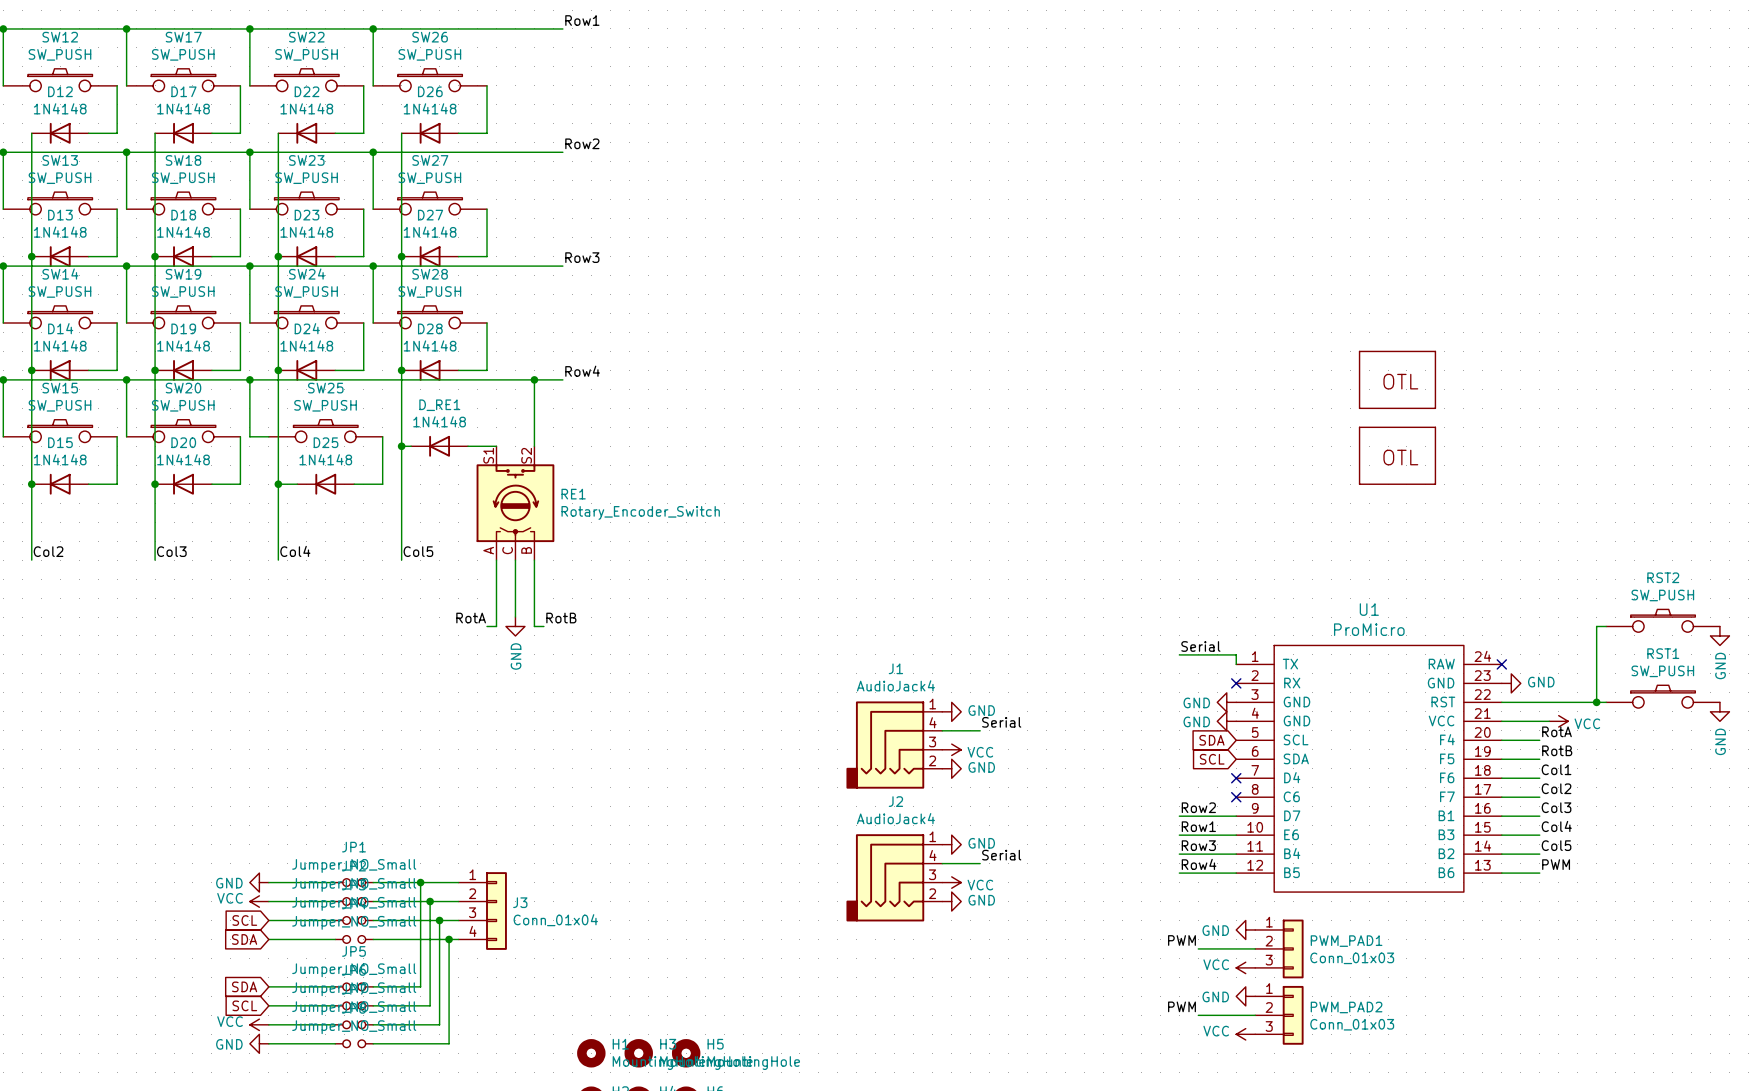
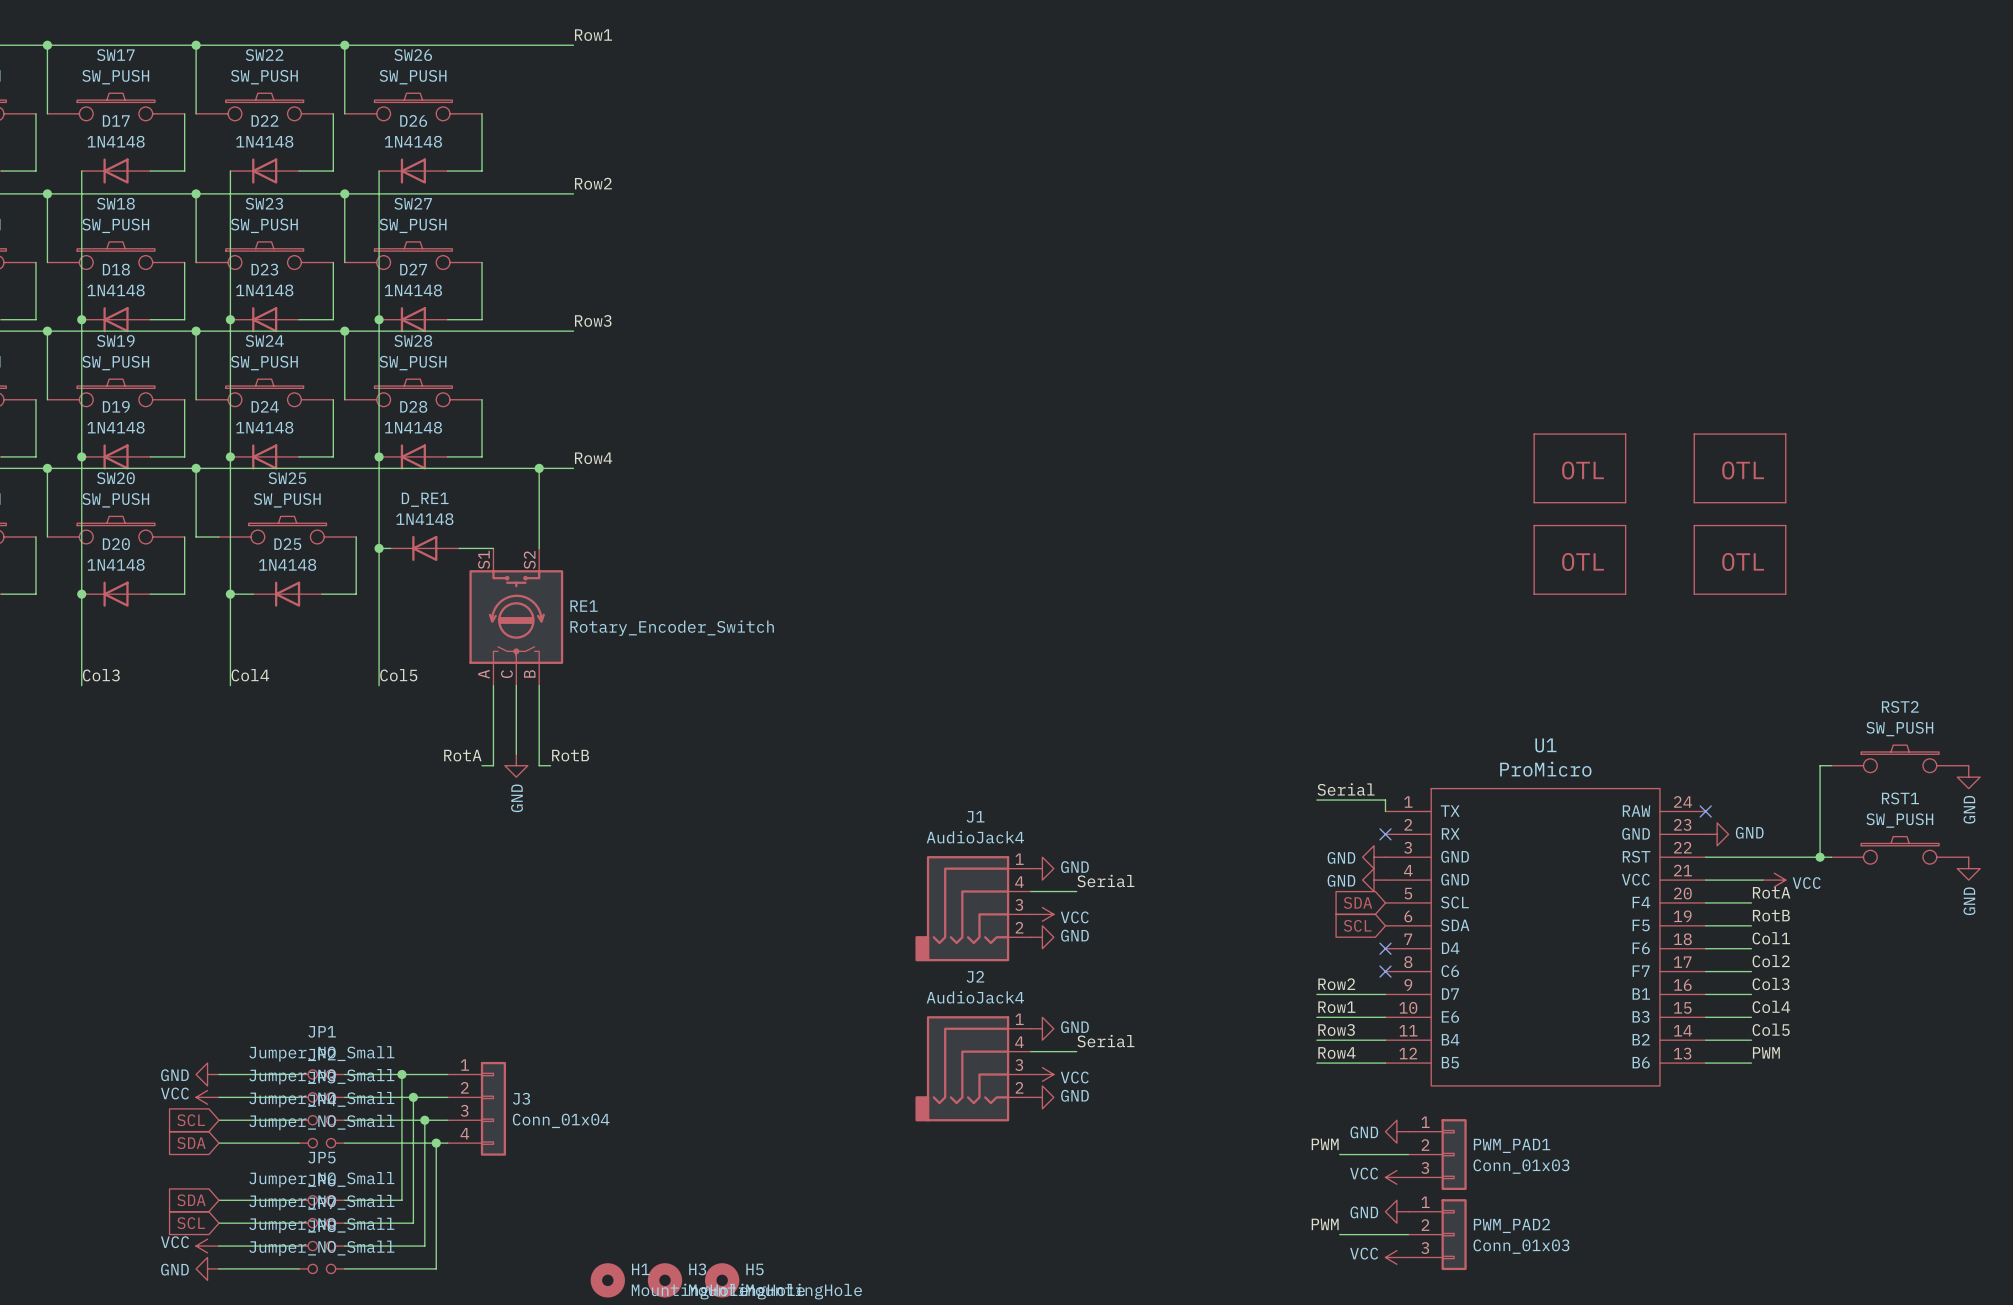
part: none -> (1740, 468)
part: none -> (1740, 559)

